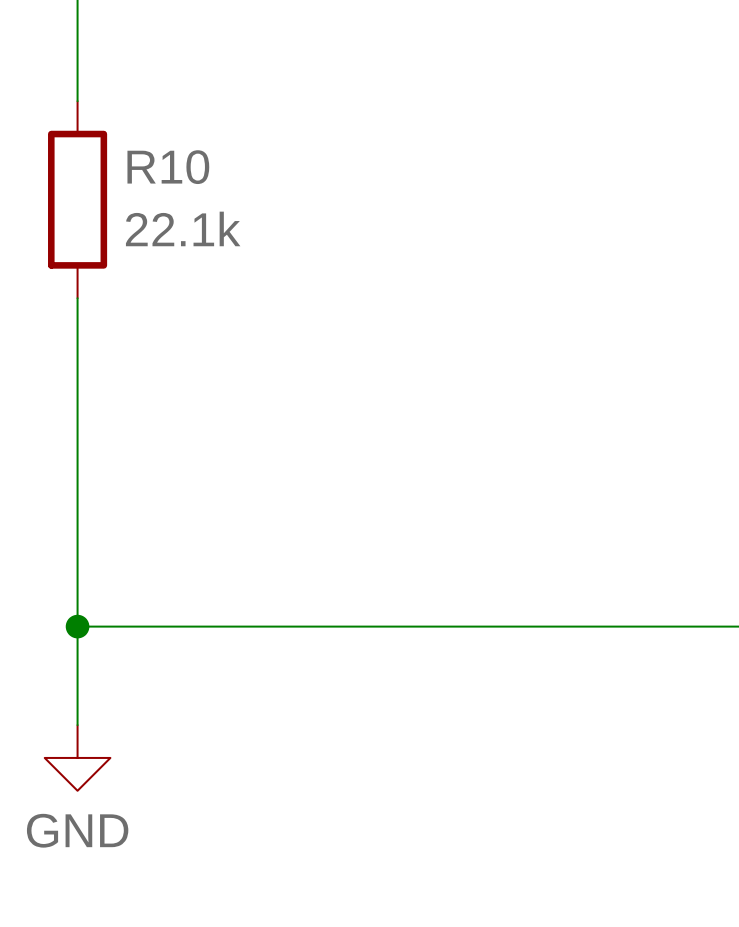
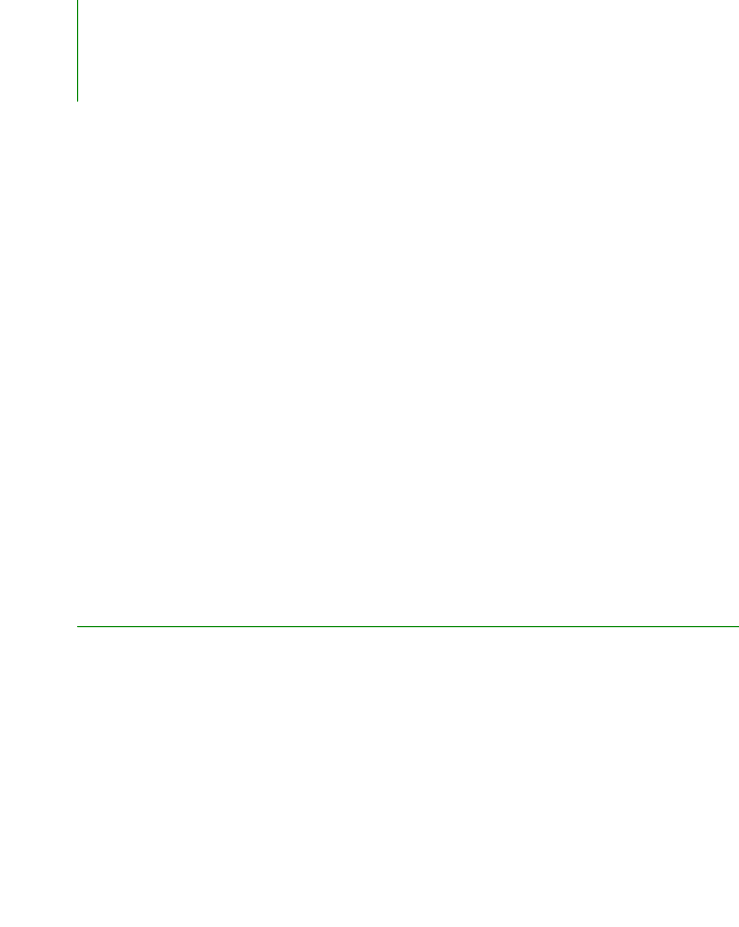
R10: 22.1k (77, 199) -> none
wire: (77, 298) (77, 725) -> none
junction: (77, 626) -> none
power symbol: GND (77, 757) -> none

